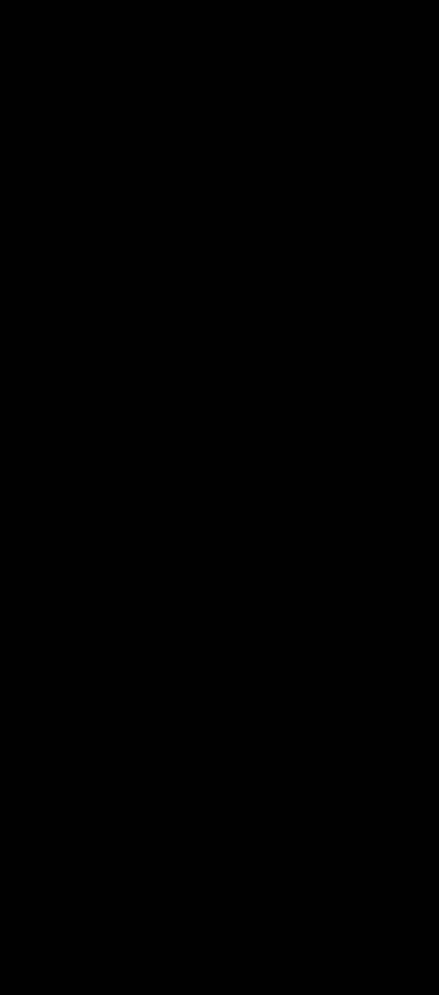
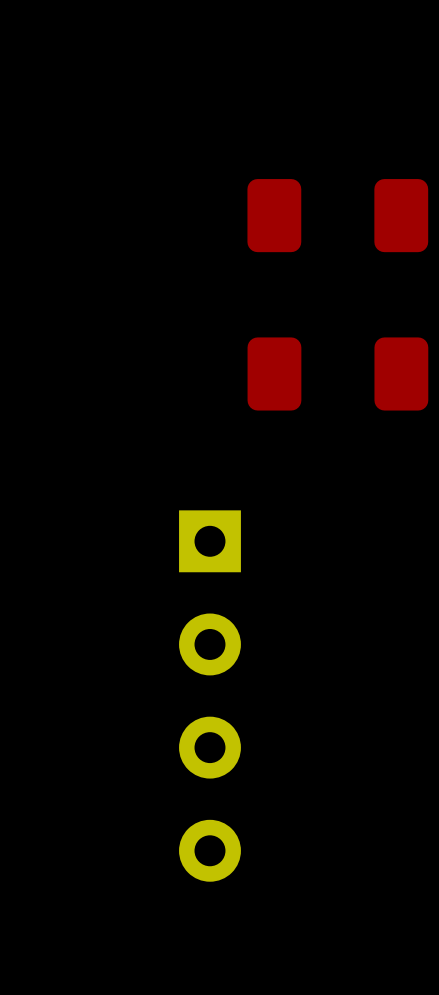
part: none -> (337, 215)
part: none -> (337, 373)
part: none -> (209, 696)

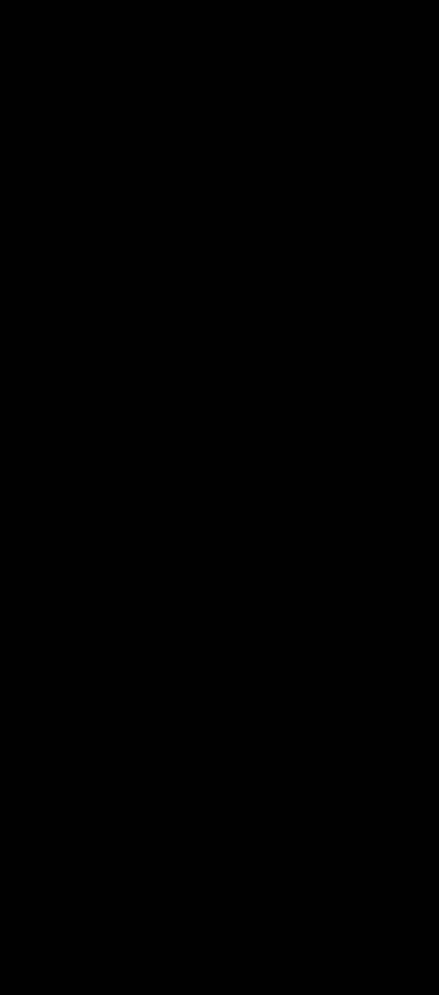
part: (337, 215) -> none
part: (337, 373) -> none
part: (209, 696) -> none

